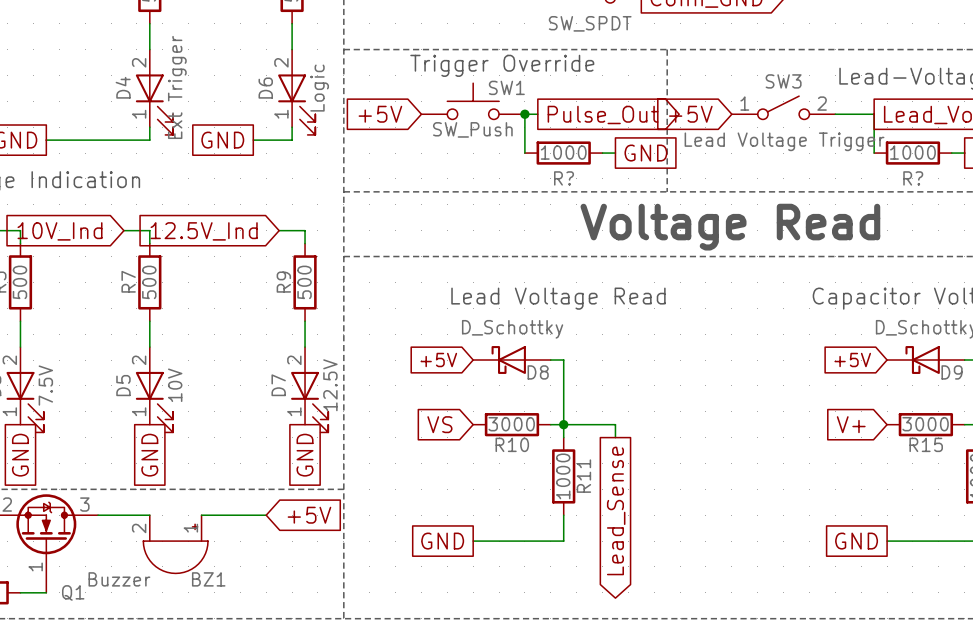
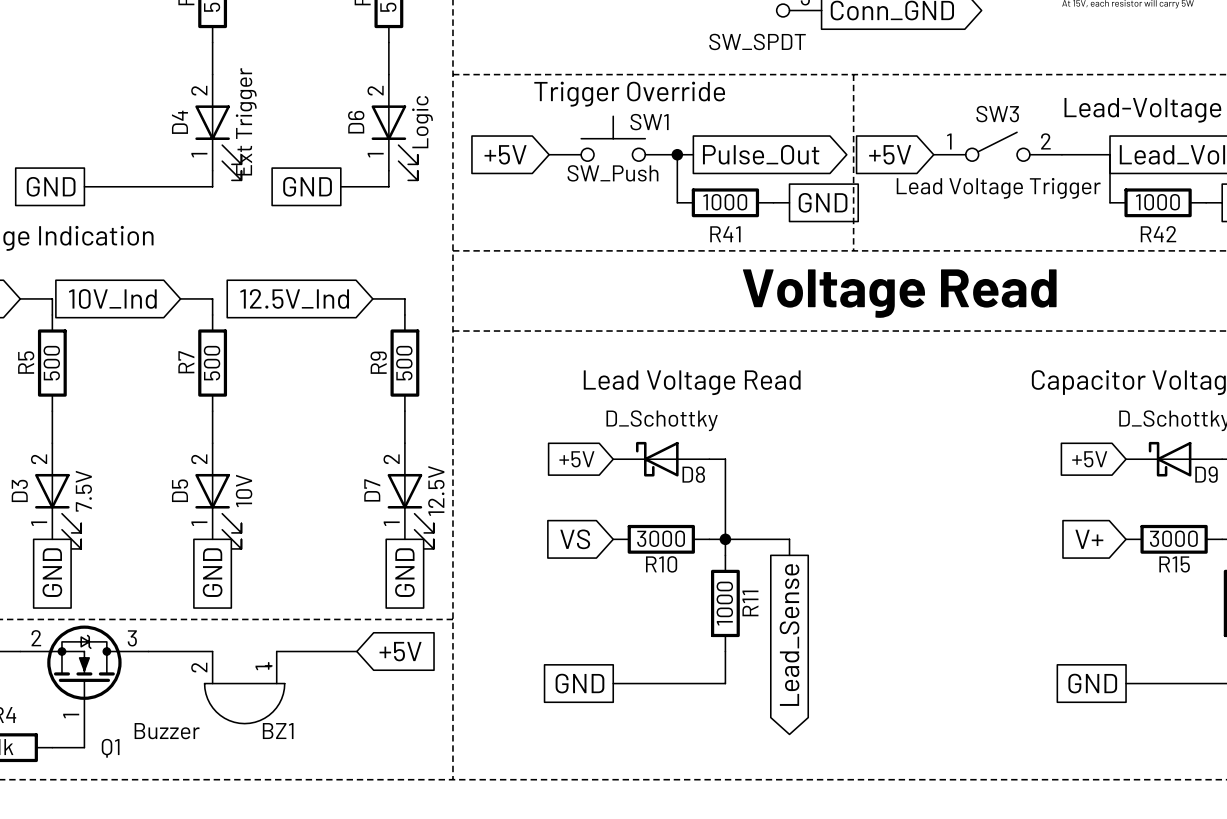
R? name: R? (564, 178) -> R41 (725, 234)
R? name: R? (913, 178) -> R42 (1158, 234)

